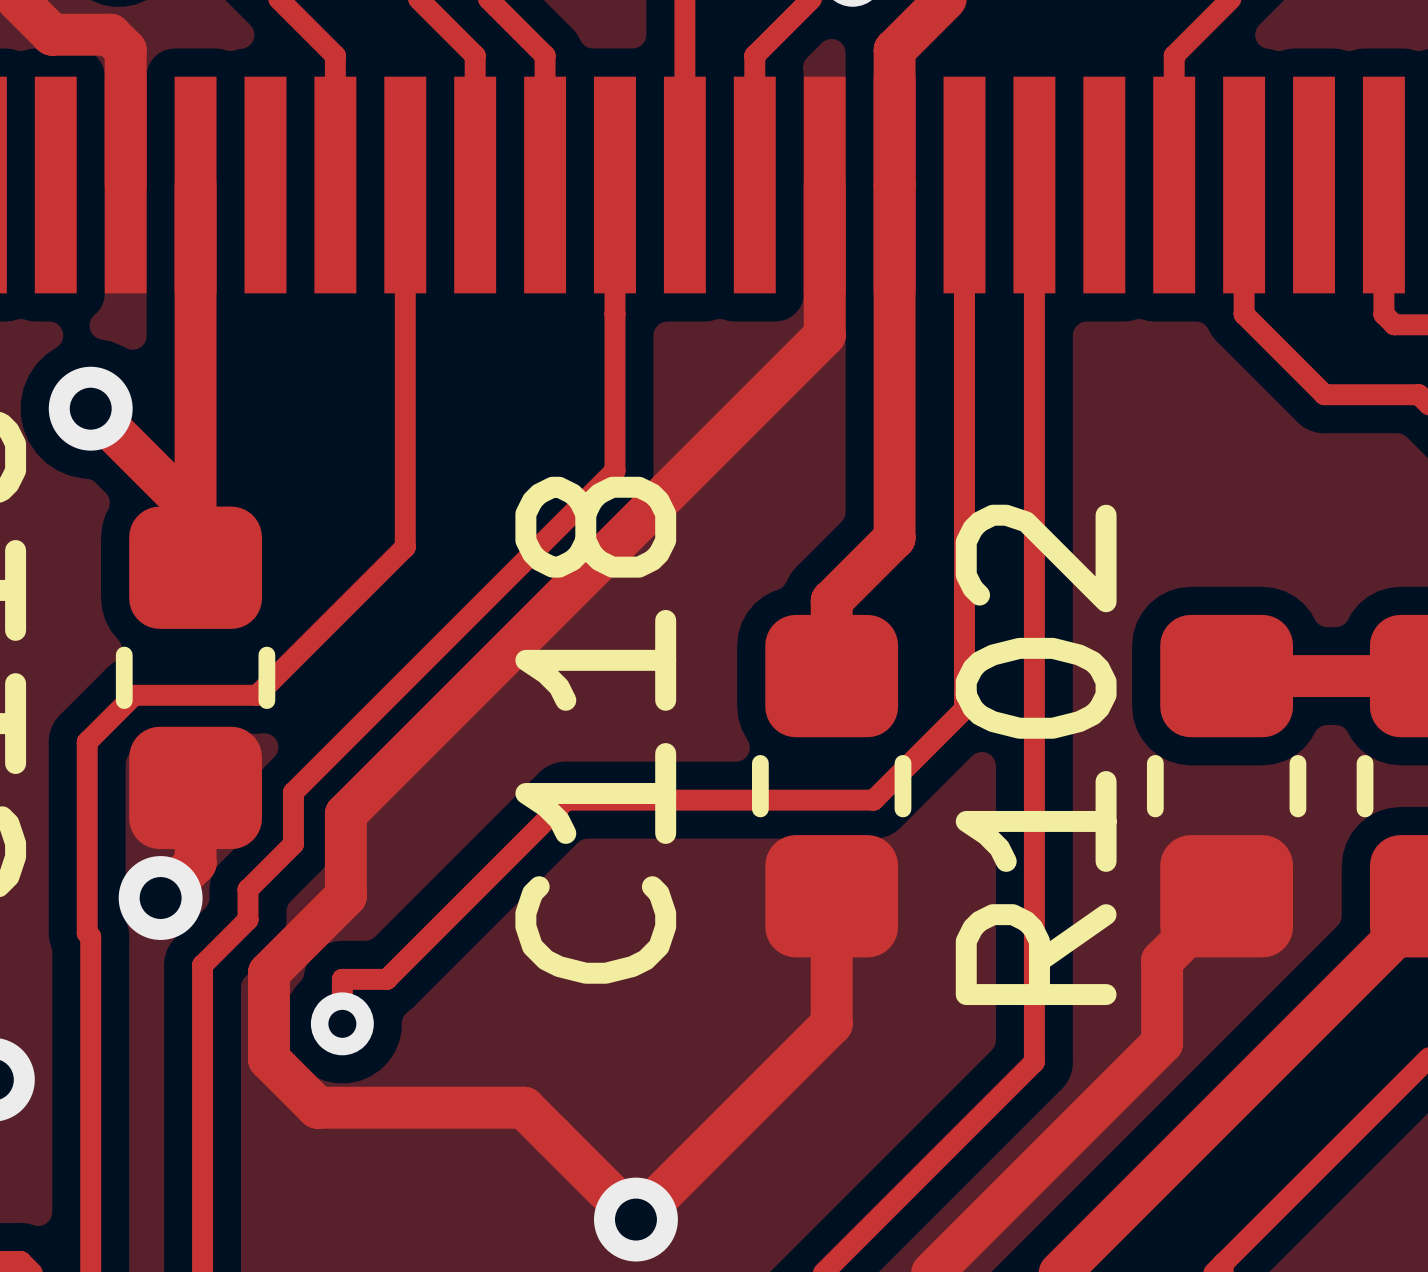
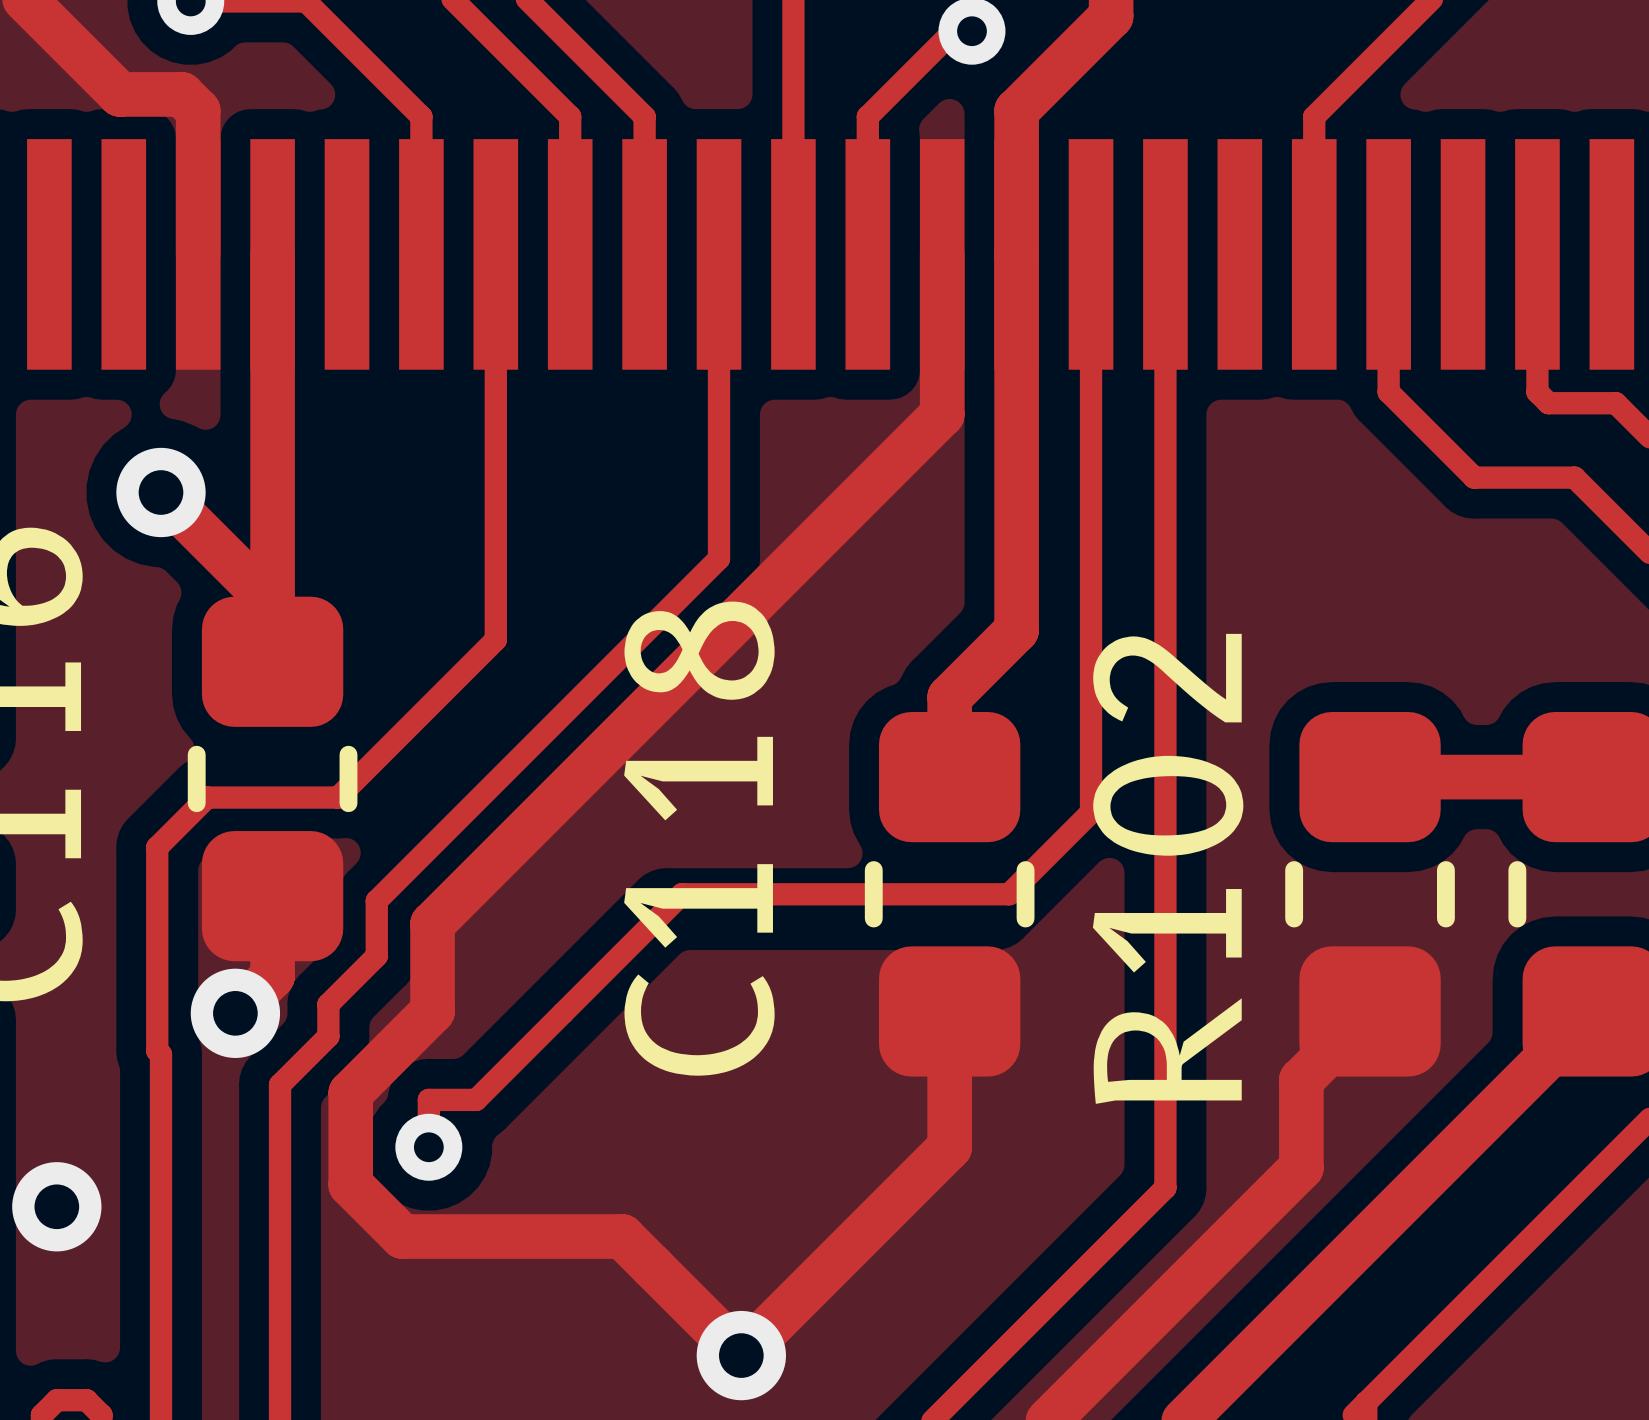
track: (887, 786) (873, 800) (566, 800) -> (1009, 894) (681, 894) (666, 909)

